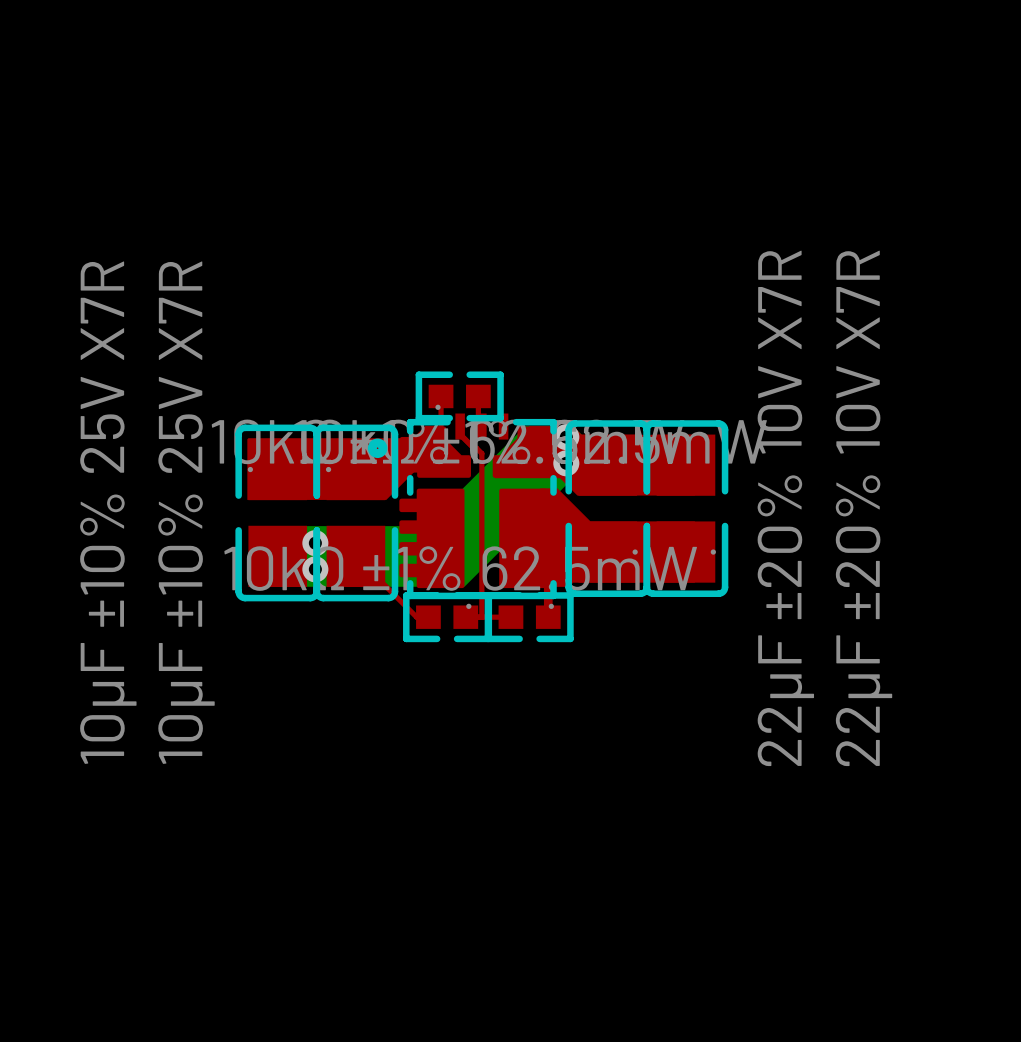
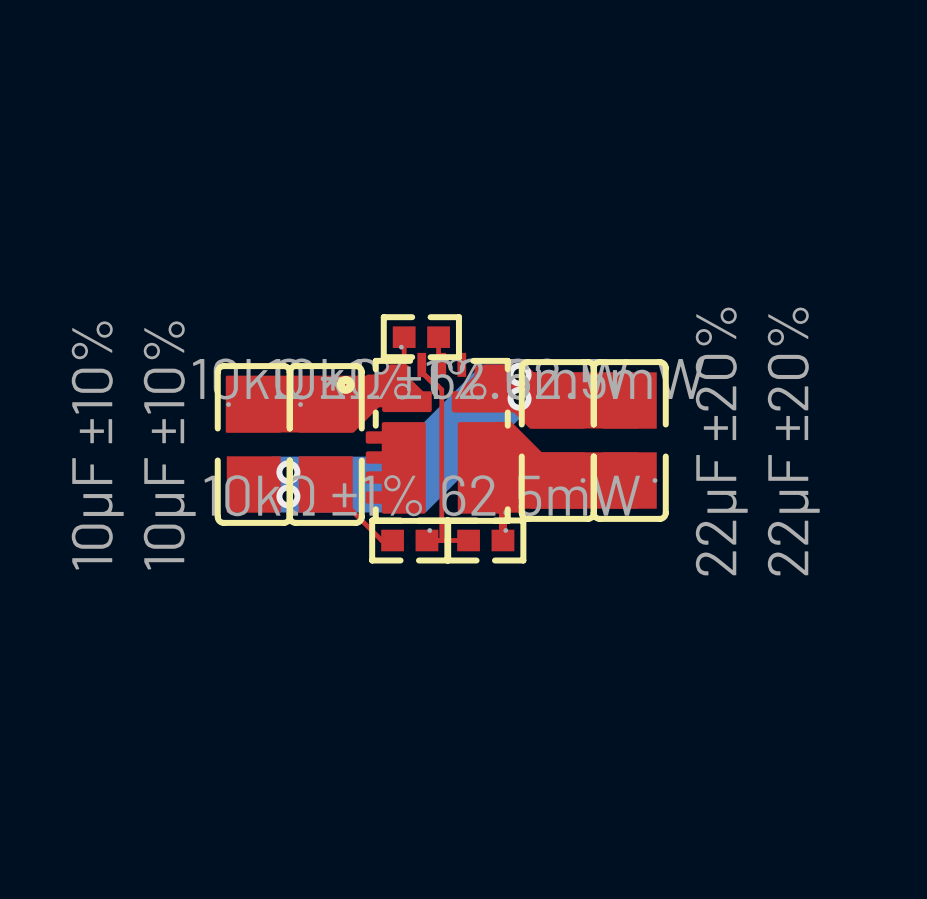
part value: 22µF ±20% 10V X7R (785, 508) -> 22µF ±20% (721, 441)
part value: 22µF ±20% 10V X7R (863, 508) -> 22µF ±20% (793, 441)
part value: 10µF ±10% 25V X7R (108, 512) -> 10µF ±10% (97, 445)
part value: 10µF ±10% 25V X7R (186, 512) -> 10µF ±10% (169, 445)

